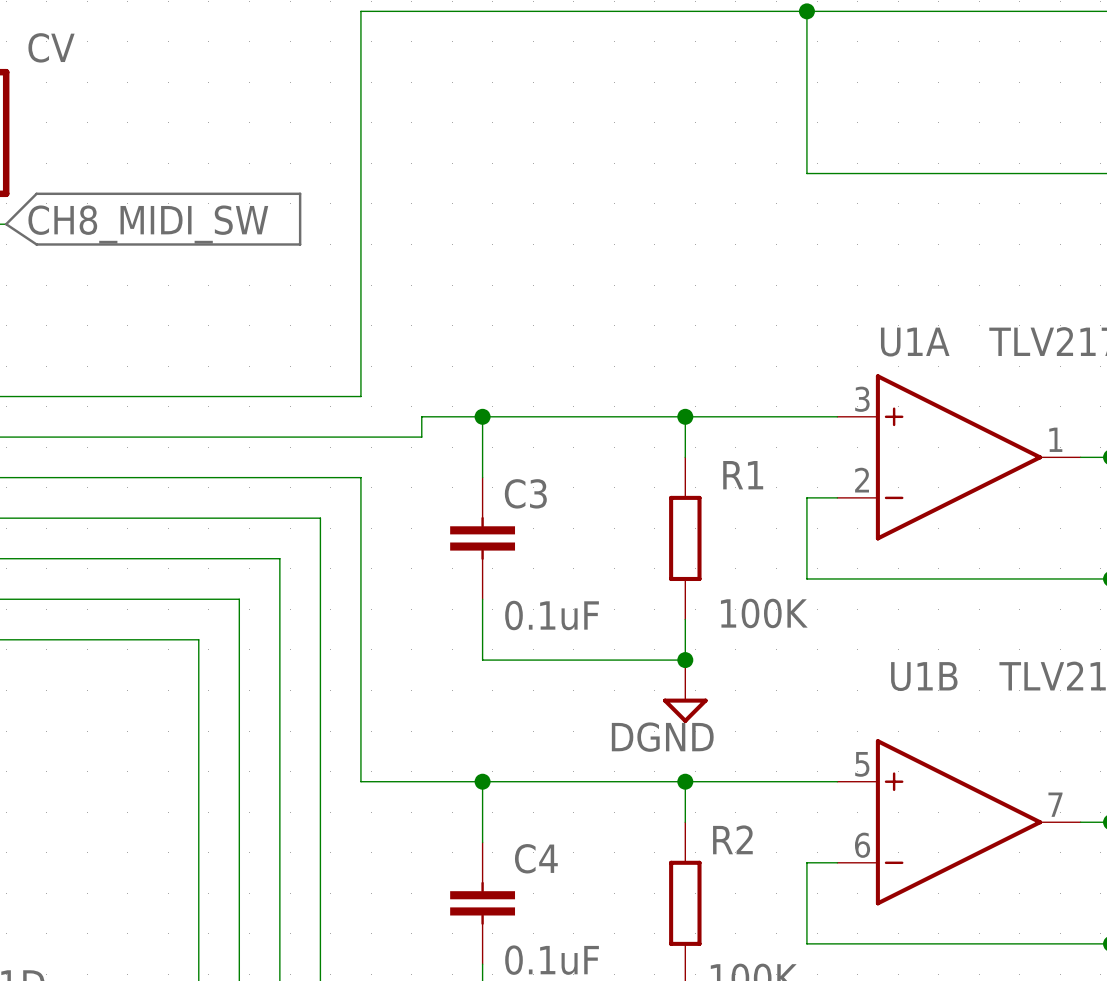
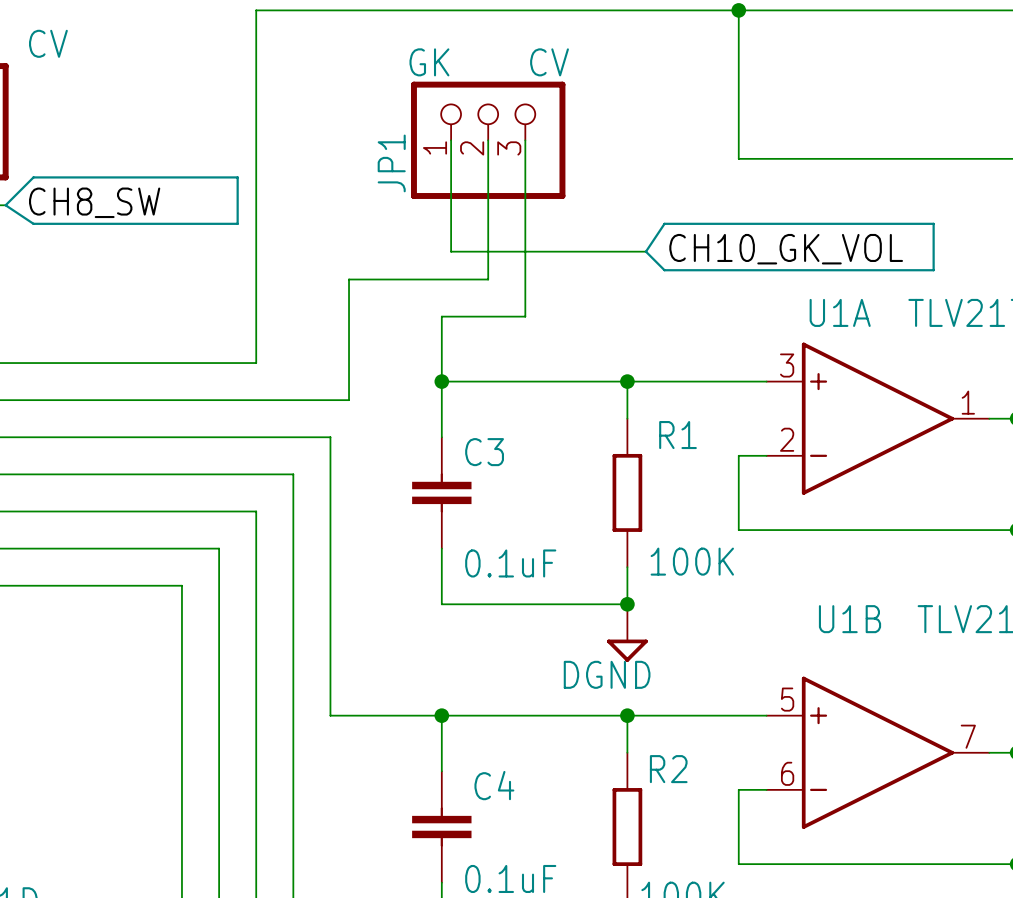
wire: (360, 11) (360, 396) (279, 396) -> (330, 10) (256, 10) (256, 363)
text: none -> GK (429, 62)
text: none -> CV (549, 62)
wire: none -> (451, 140) (451, 251) (645, 251)
JP1: none -> (488, 140)
wire: none -> (525, 140) (525, 316) (441, 316) (441, 381)
line: (259, 193) (300, 193) (300, 244) (259, 244) -> (237, 177) (237, 223)
label: CH8_MIDI_SW (148, 224) -> CH8_SW (94, 202)
line: none -> (664, 223) (933, 223) (933, 270) (664, 270) (645, 251) (664, 223)
label: none -> CH10_GK_VOL (786, 249)
wire: (482, 416) (421, 416) (421, 437) (381, 437) -> (488, 140) (488, 279) (349, 279) (349, 400)

